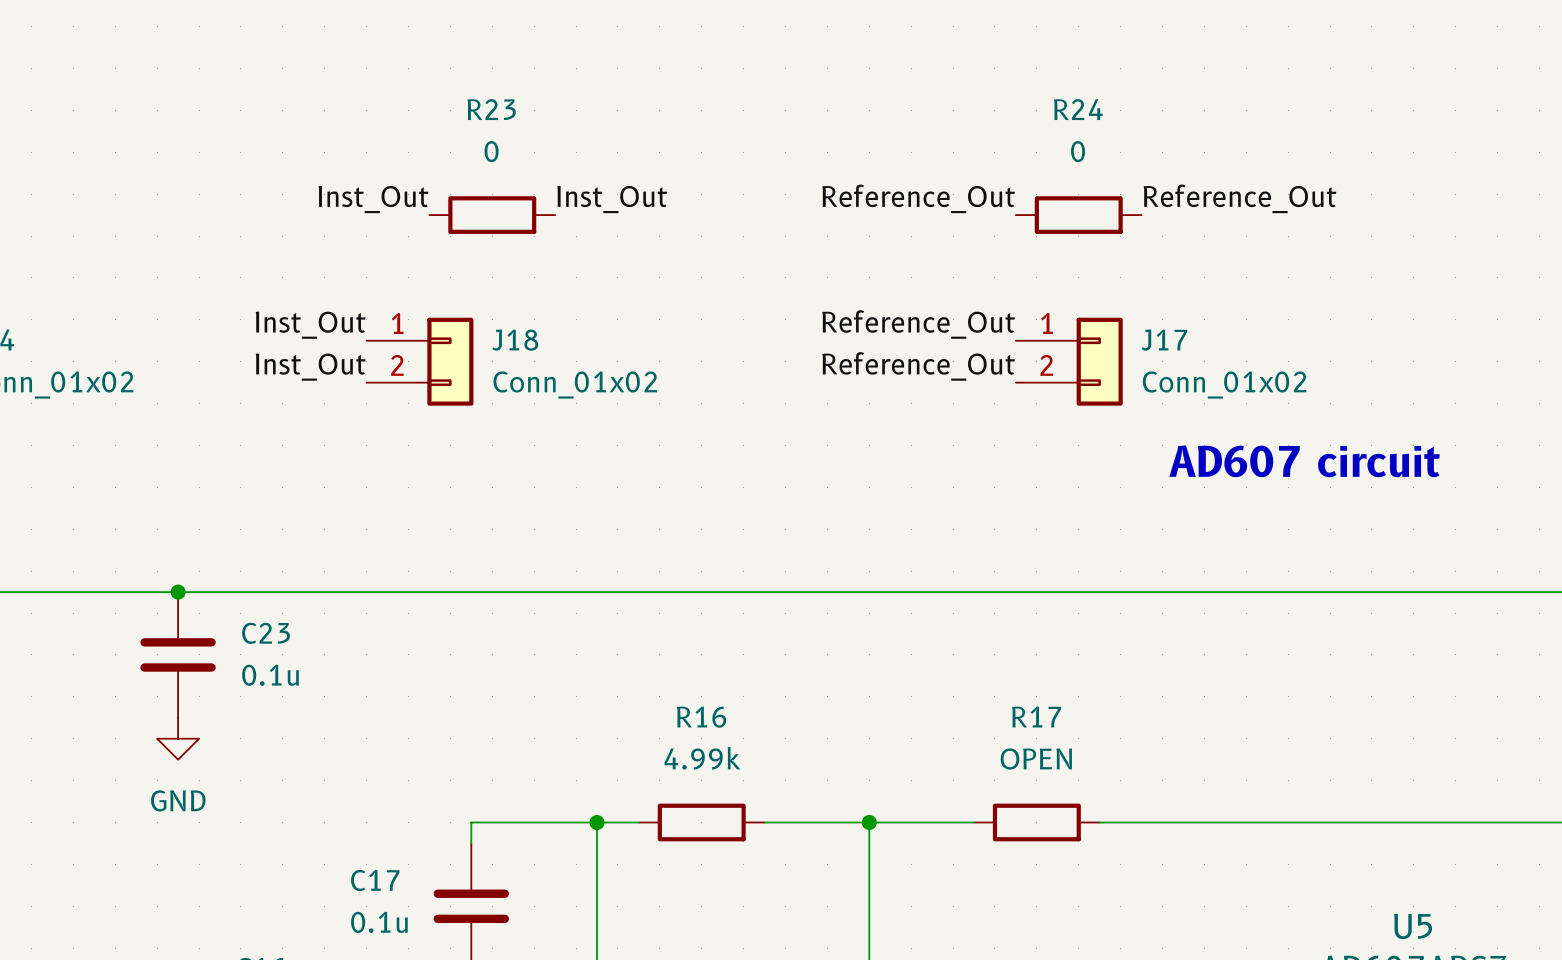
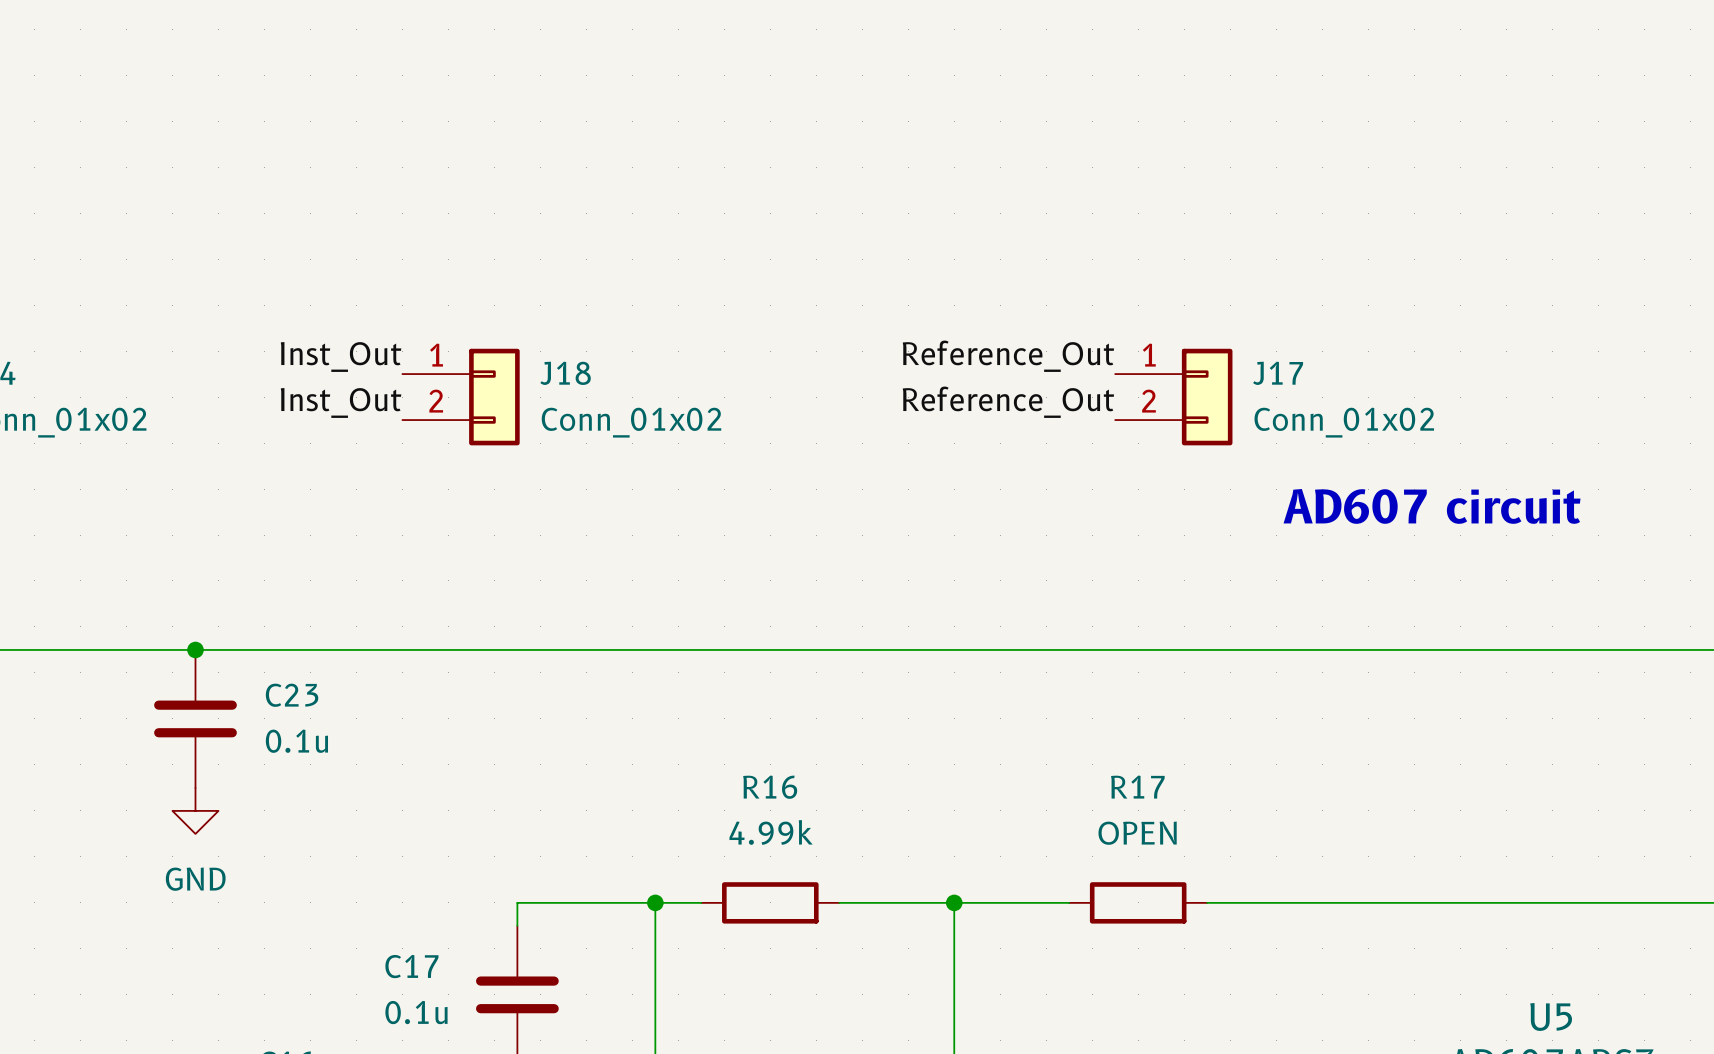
label: Reference_Out (918, 198) -> none
label: Reference_Out (1239, 198) -> none
label: Inst_Out (373, 199) -> none
label: Inst_Out (612, 199) -> none
R23: 0 (492, 215) -> none
R24: 0 (1078, 215) -> none

